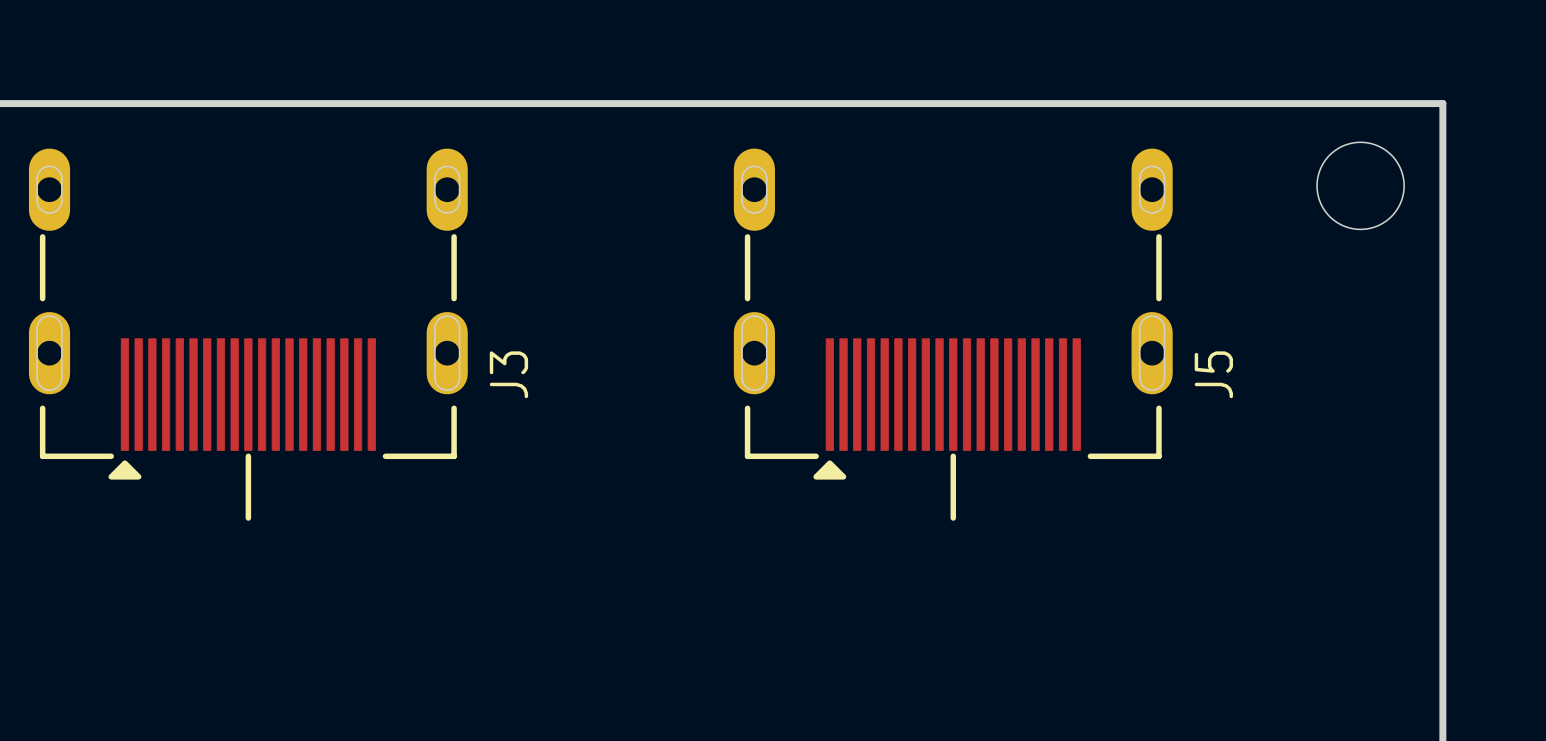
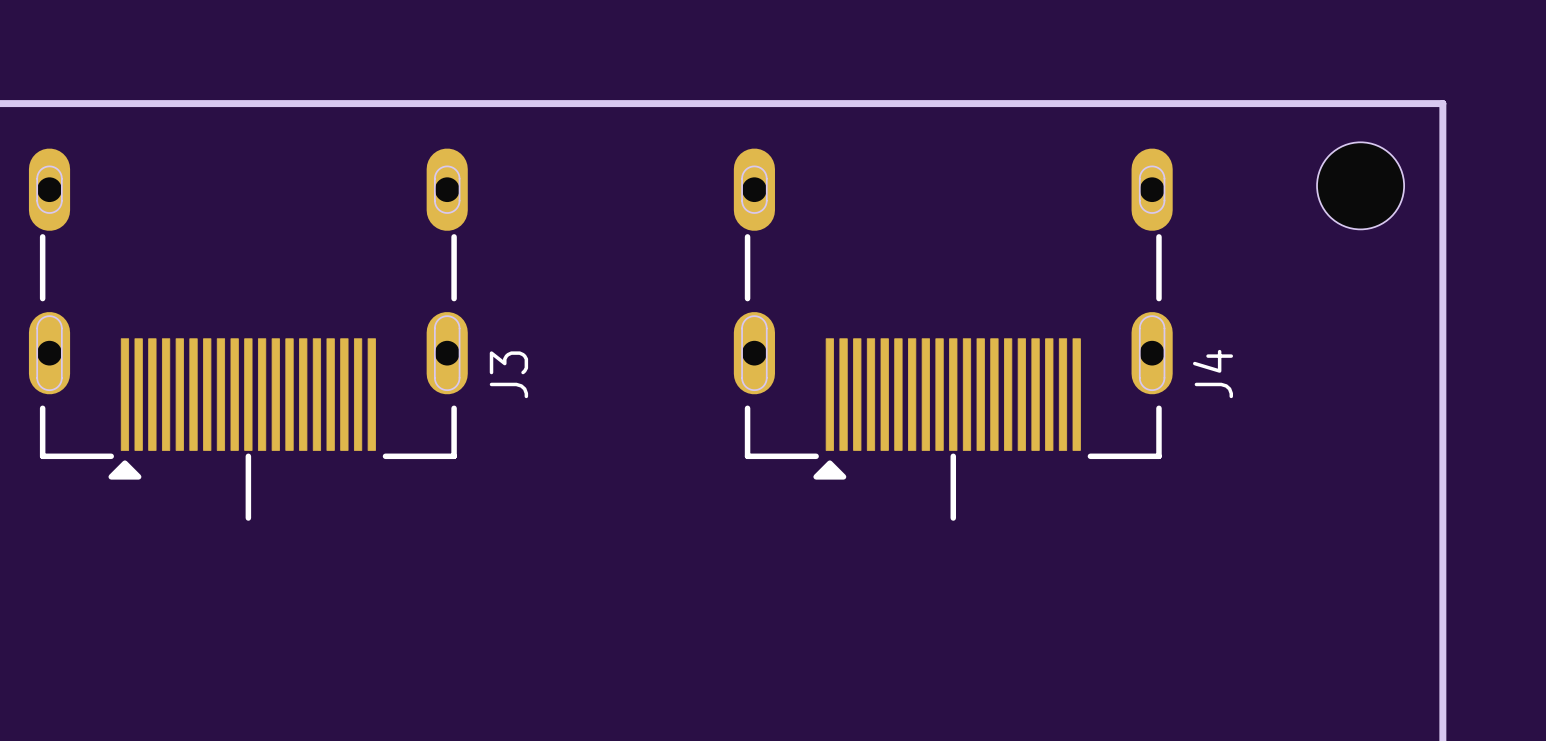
J5 name: J5 (1213, 374) -> J4 (1213, 374)

